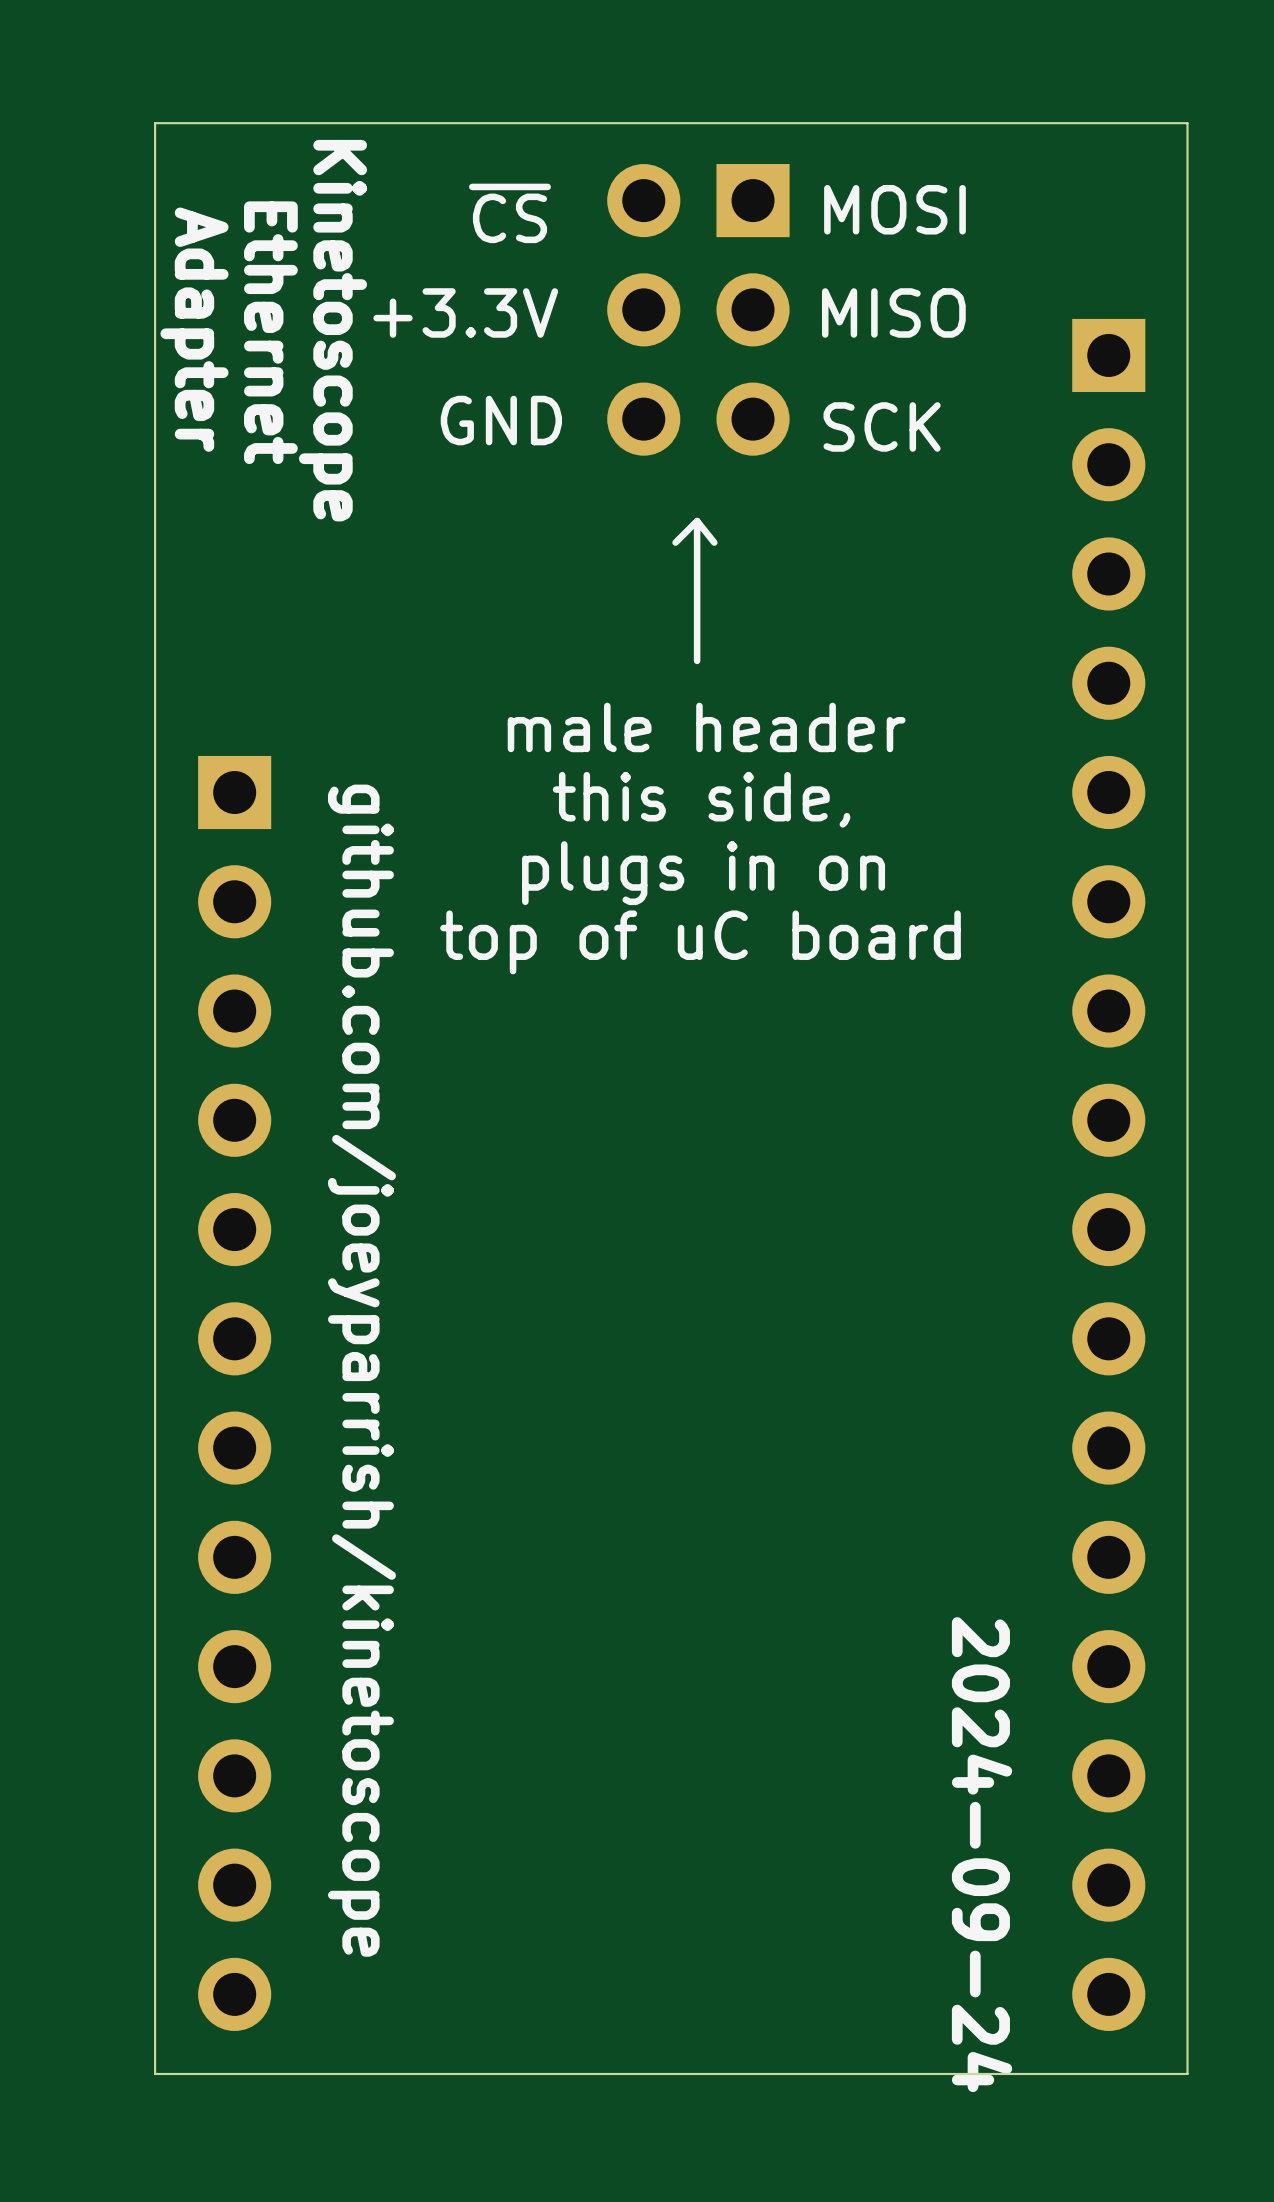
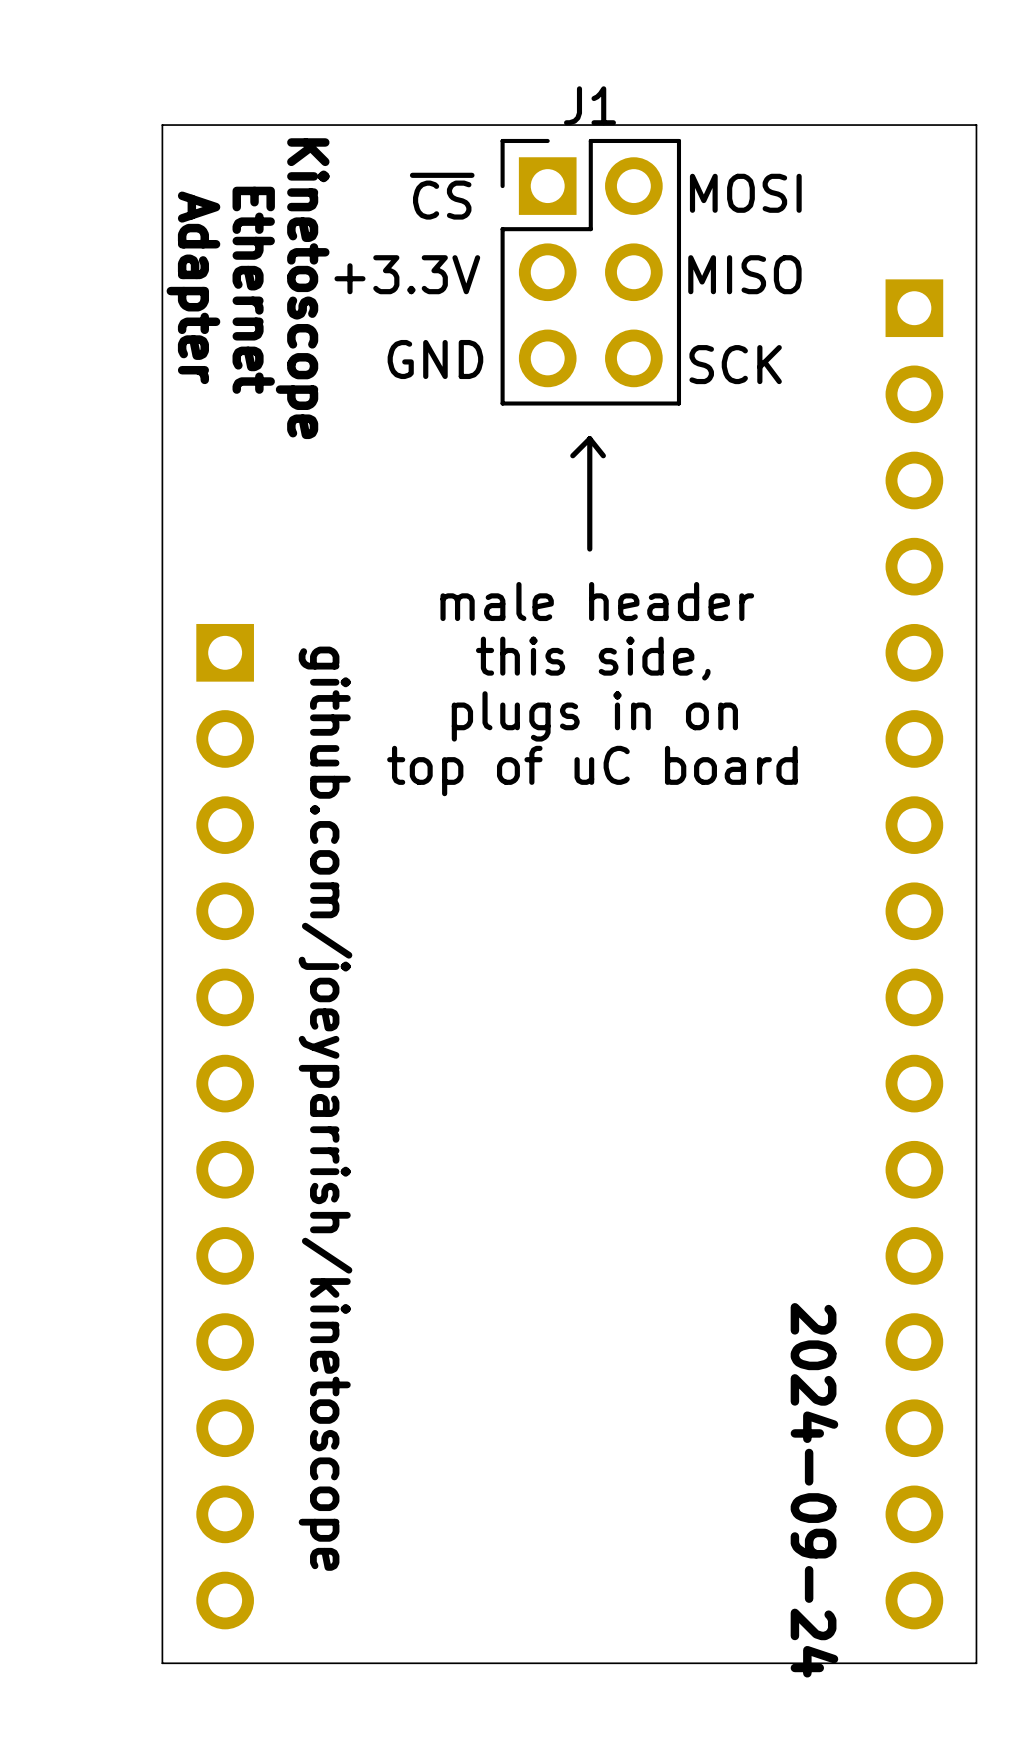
part: (698, 309) -> none
J1: none -> (590, 272)

